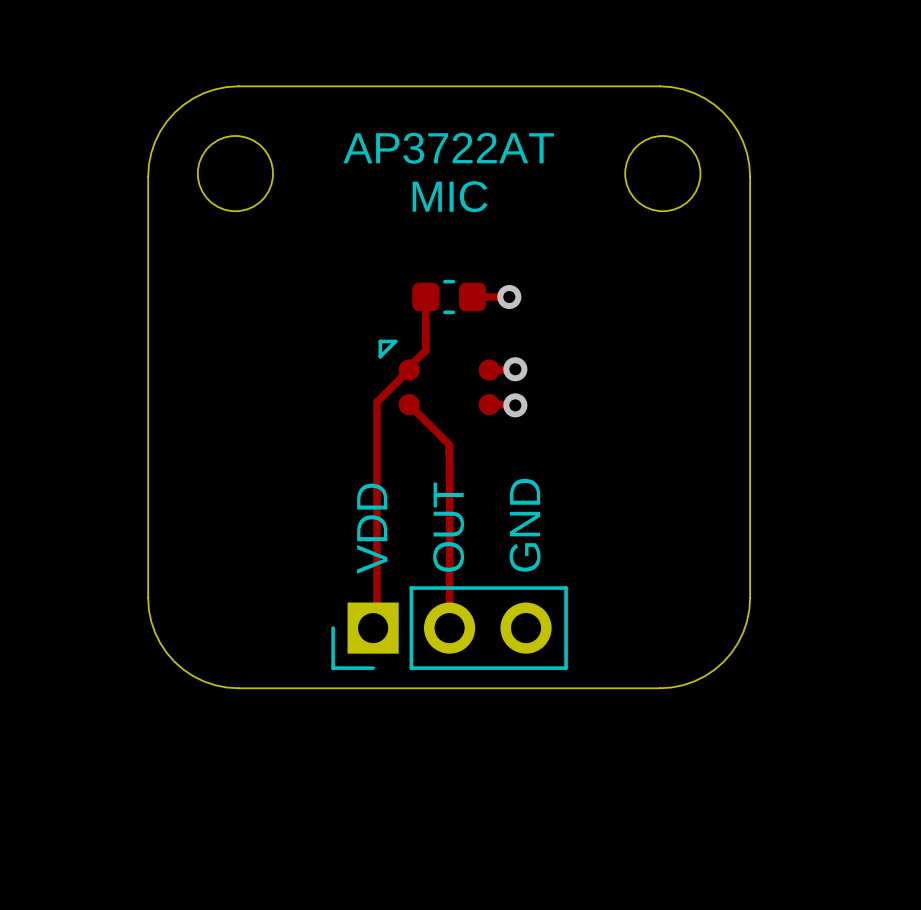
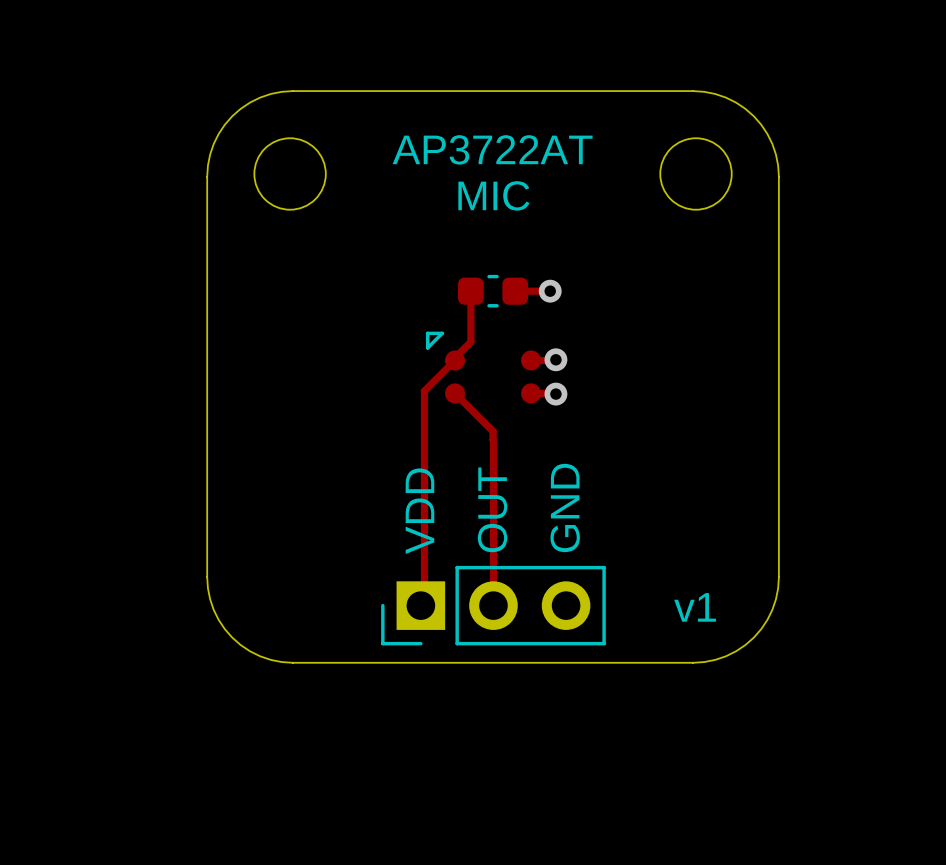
text: none -> v1 (695, 607)

